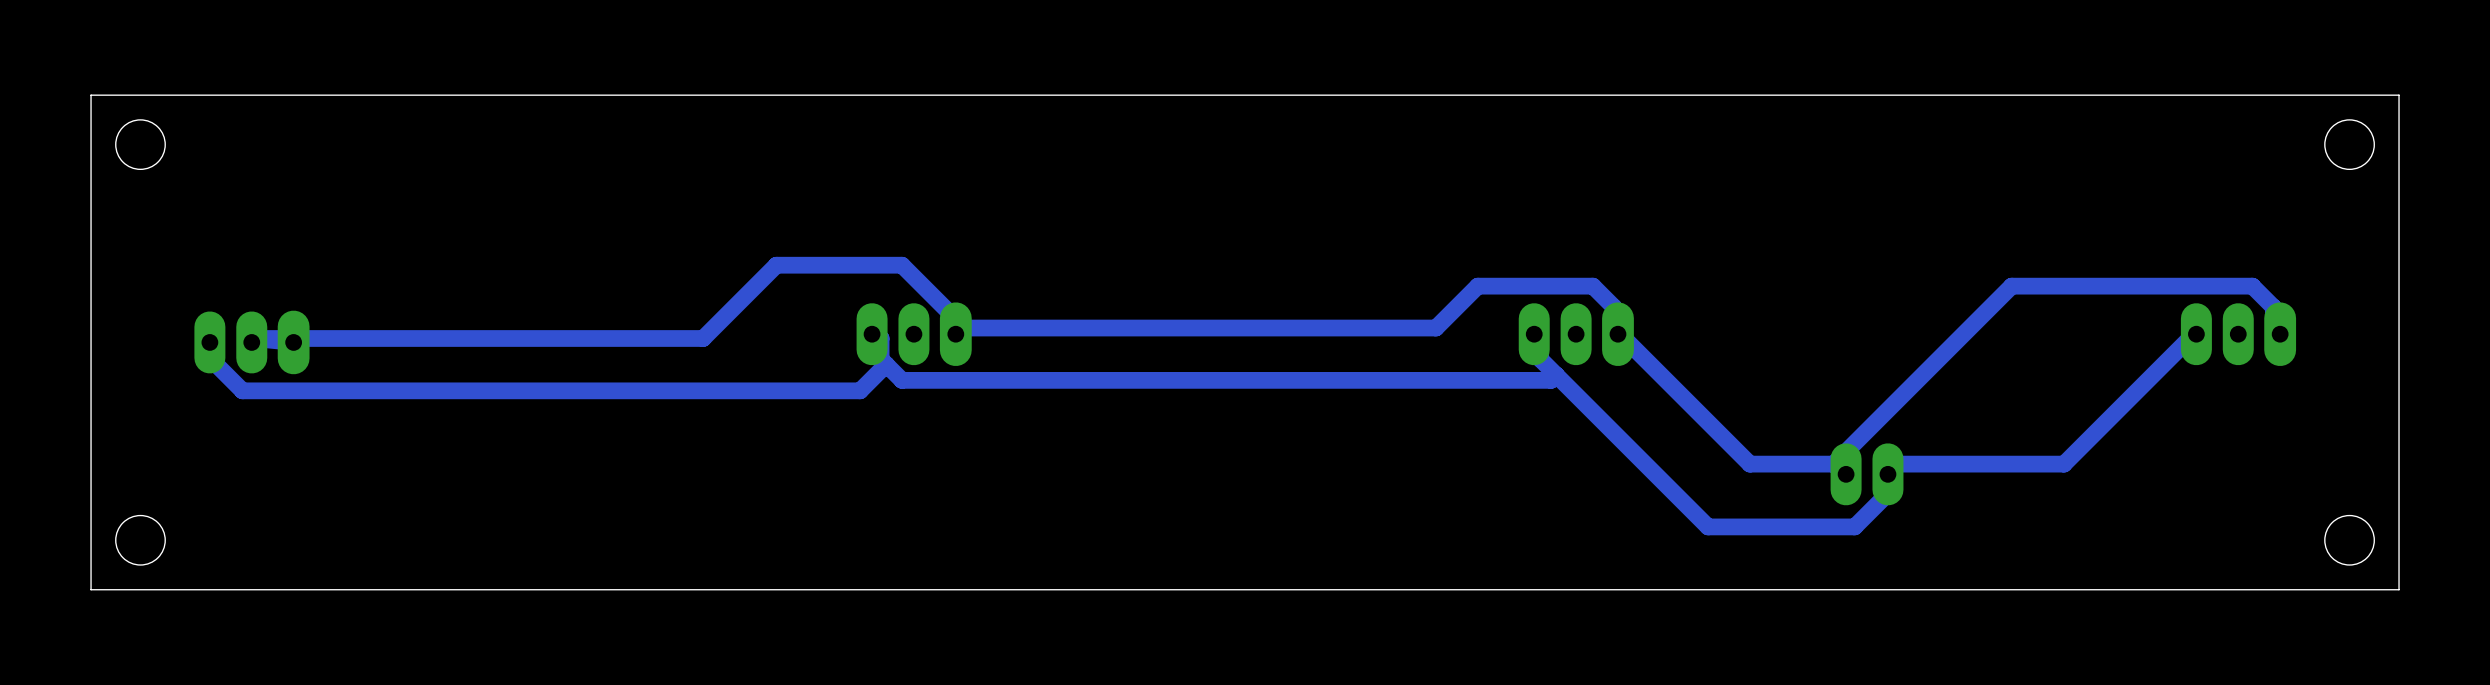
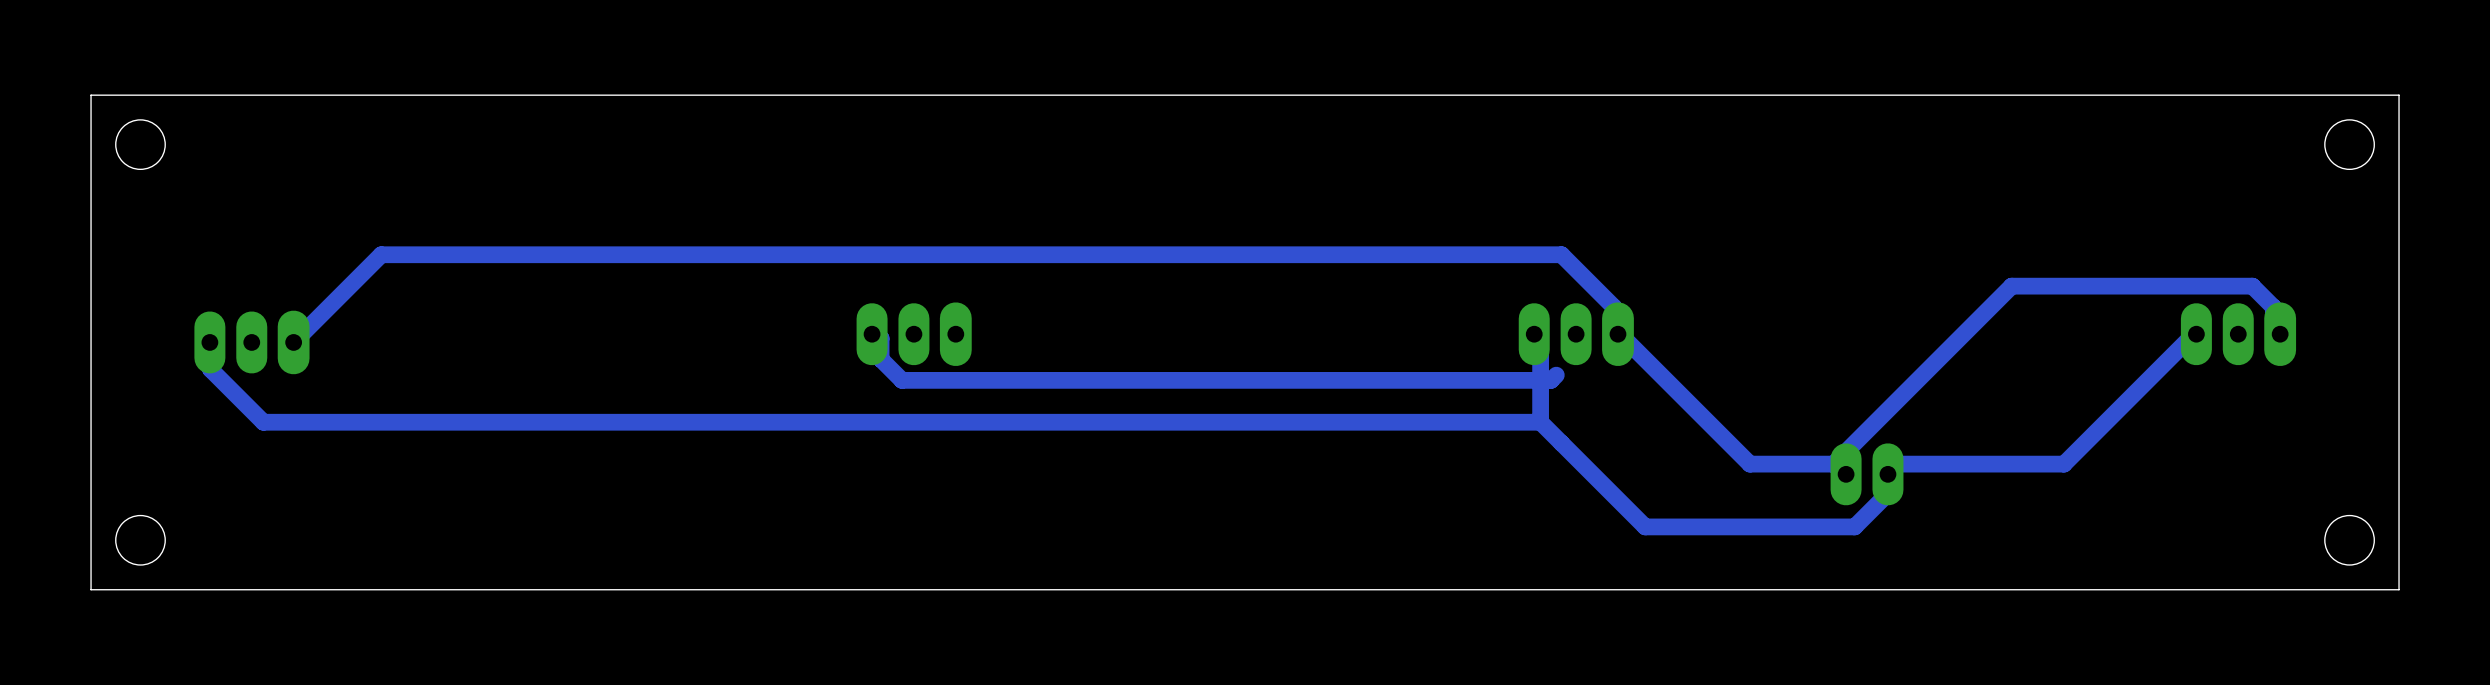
track: (1592, 286) (1477, 286) (1435, 328) (964, 328) -> (1592, 286) (1561, 254) (381, 254) (293, 342)
track: (964, 328) (902, 265) (776, 265) (703, 338) (253, 338) (297, 342) -> none
track: (209, 342) (211, 359) (242, 390) (860, 390) (886, 364) -> (210, 342) (210, 369) (263, 422) (1540, 422)
track: (1540, 359) (1708, 526) -> (1540, 422) (1645, 526) (1708, 526)
track: none -> (1540, 359) (1540, 422)

